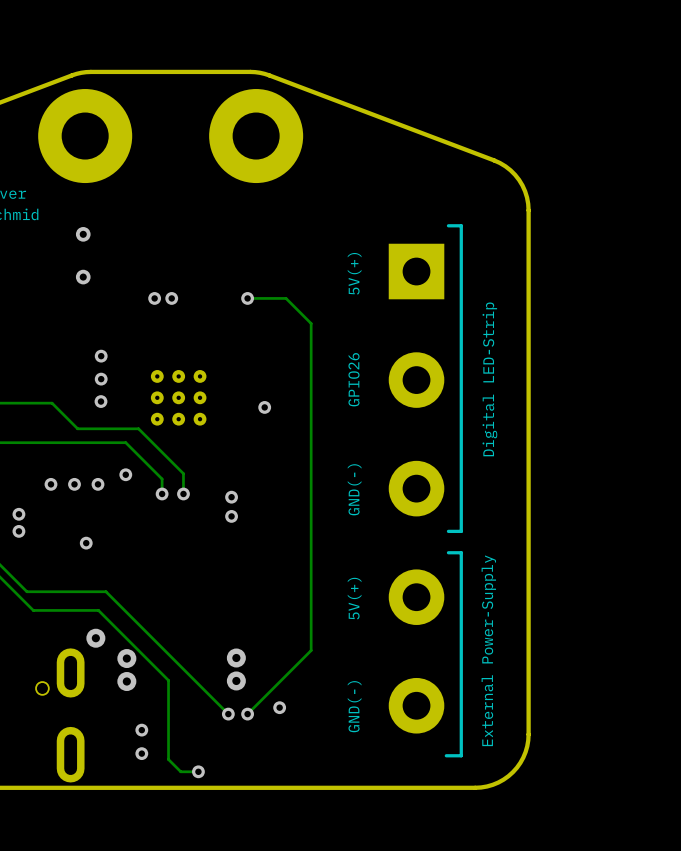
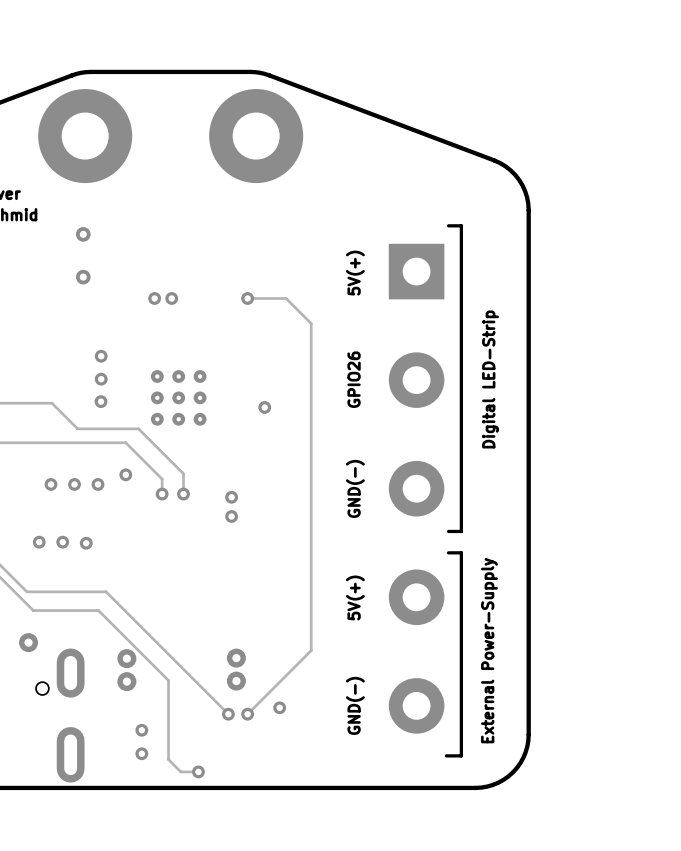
via: (18, 514) -> none
via: (18, 531) -> none
via: none -> (39, 542)
via: none -> (62, 542)
via position: (95, 638) -> (28, 642)

